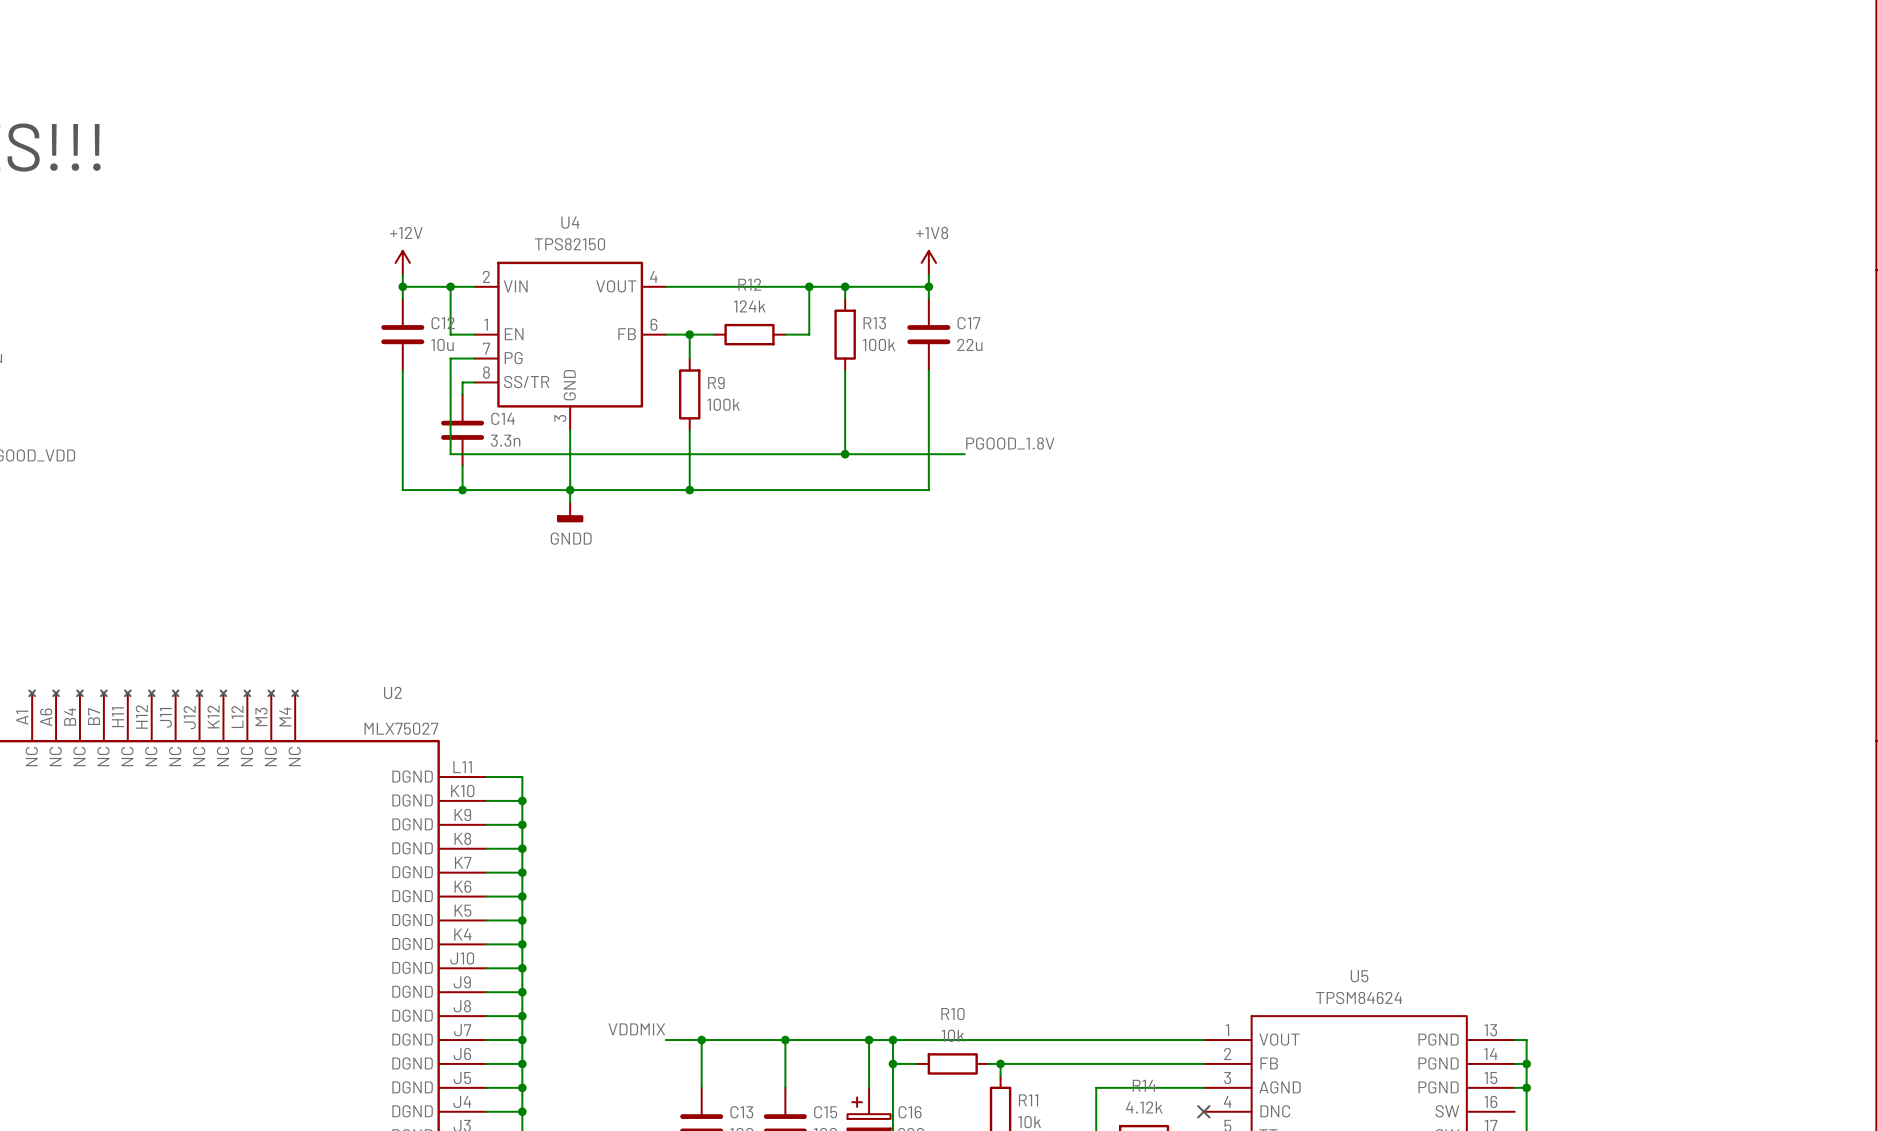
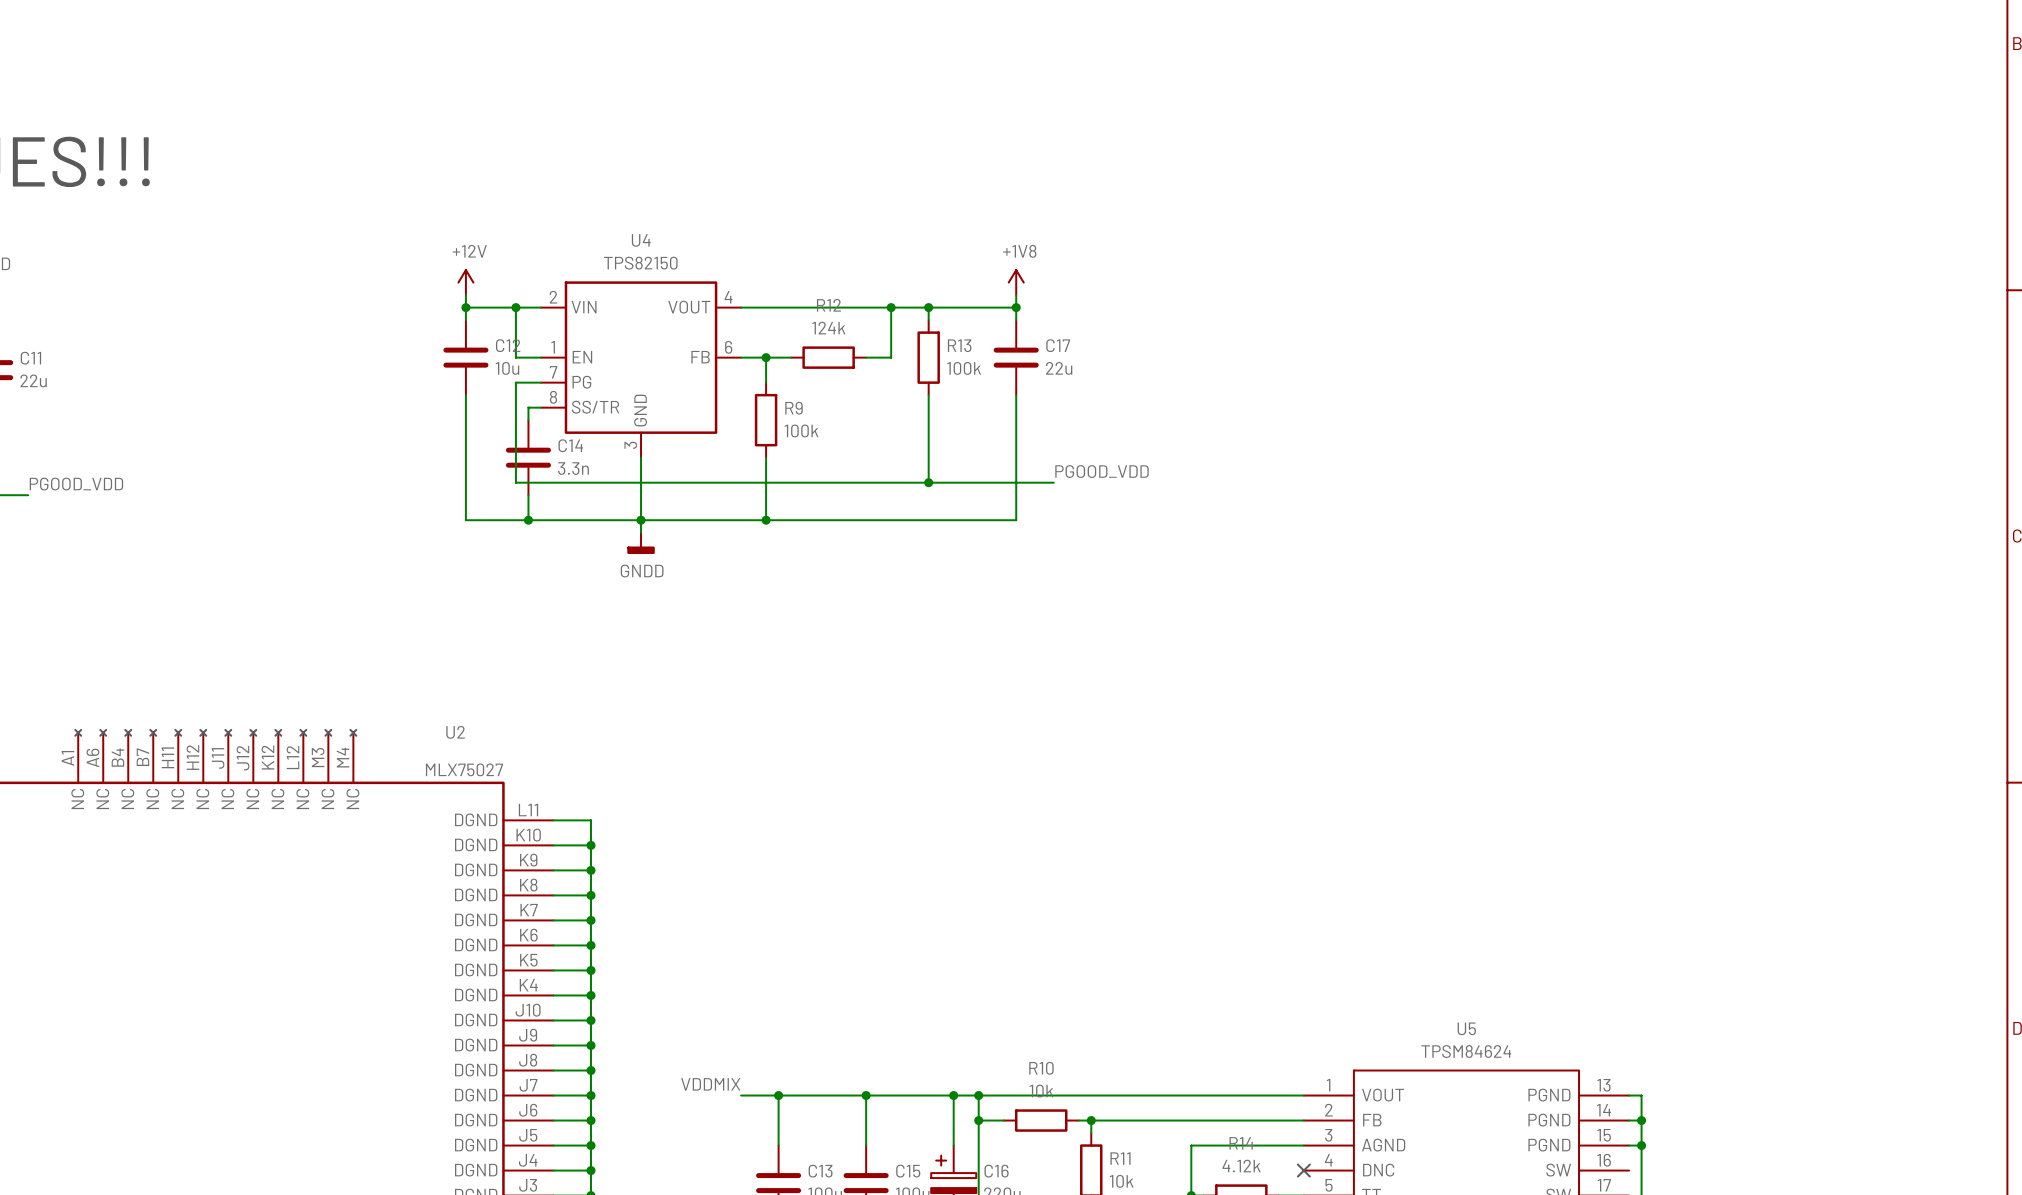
label: PGOOD_1.8V (1010, 443) -> PGOOD_VDD (1101, 471)

